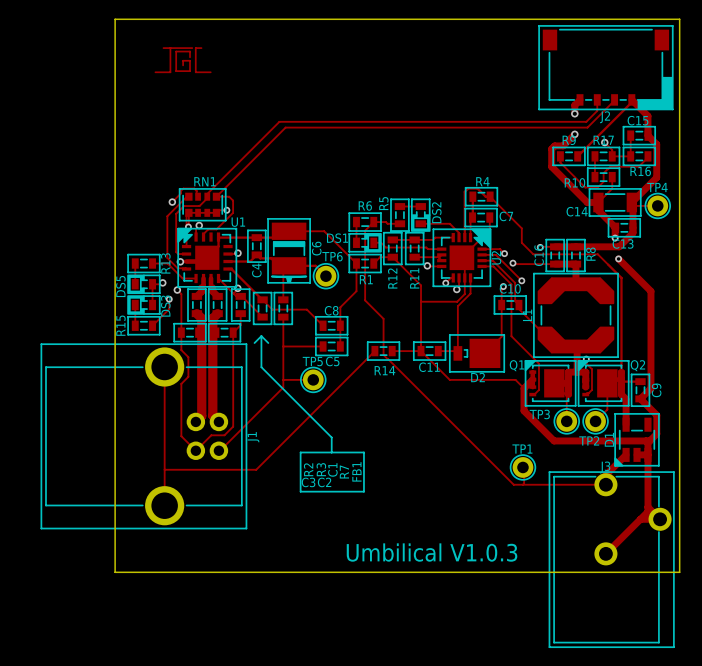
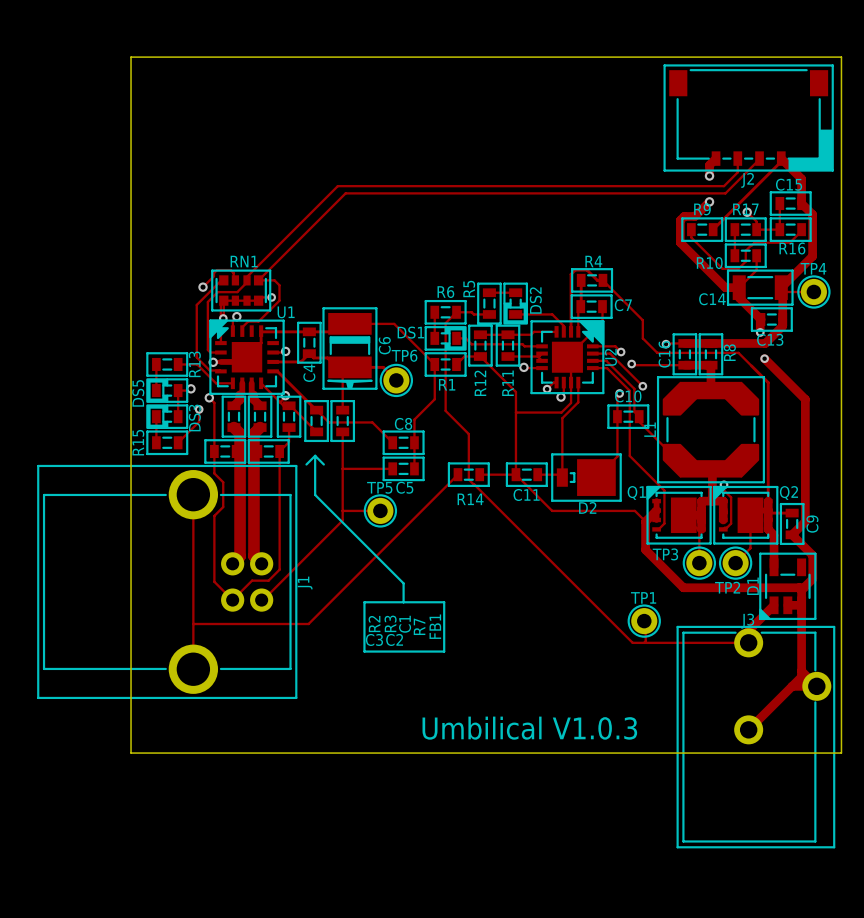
drawing: [154, 47, 212, 74] -> none

